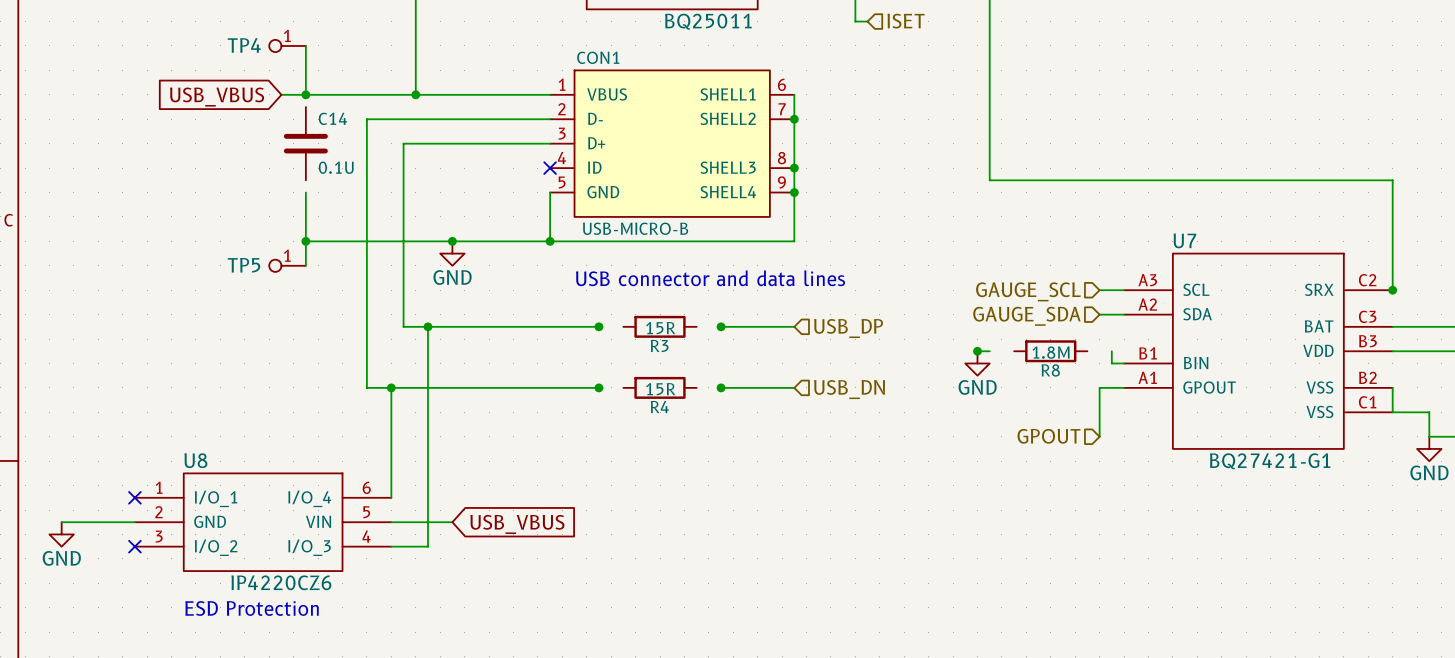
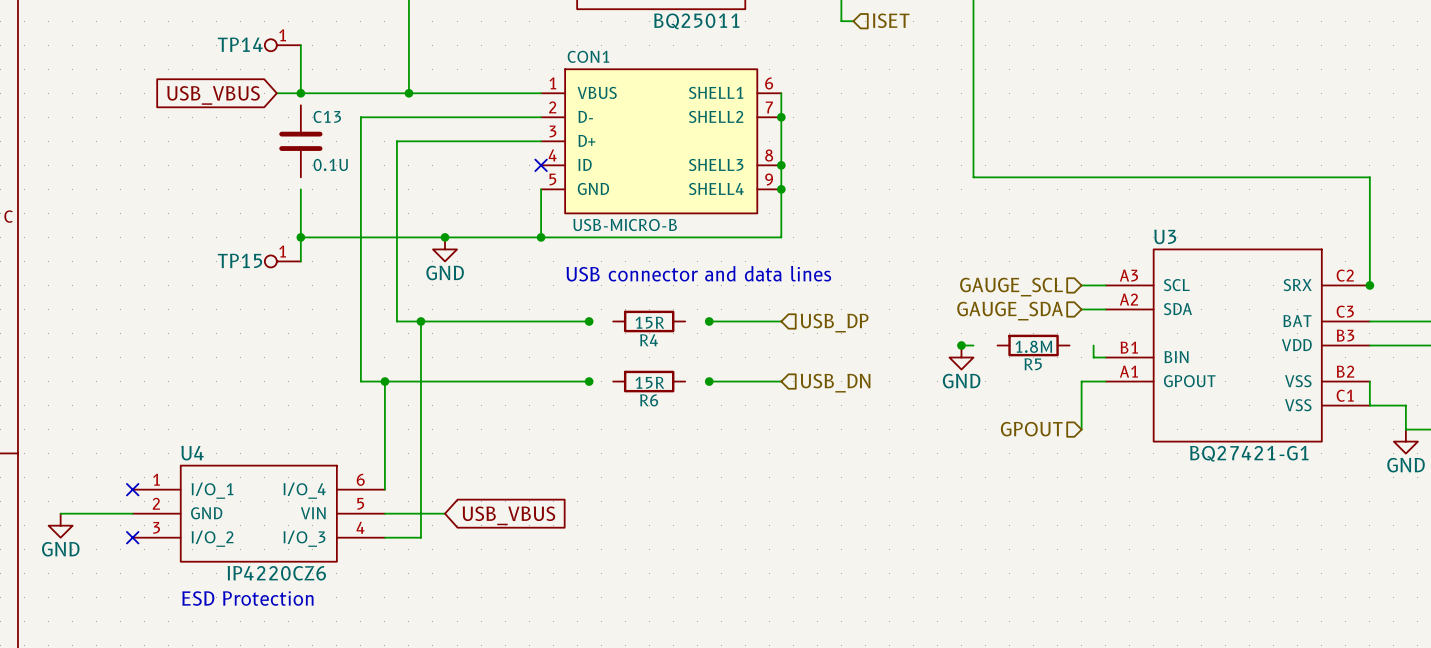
TP4 name: TP4 (244, 45) -> TP14 (240, 44)
C14 name: C14 (332, 118) -> C13 (327, 116)
U7 name: U7 (1184, 240) -> U3 (1165, 236)
TP5 name: TP5 (243, 265) -> TP15 (239, 260)
R3 name: R3 (659, 345) -> R4 (649, 340)
R8 name: R8 (1050, 370) -> R5 (1033, 364)
R4 name: R4 (659, 406) -> R6 (649, 400)
U8 name: U8 (195, 460) -> U4 (192, 453)

